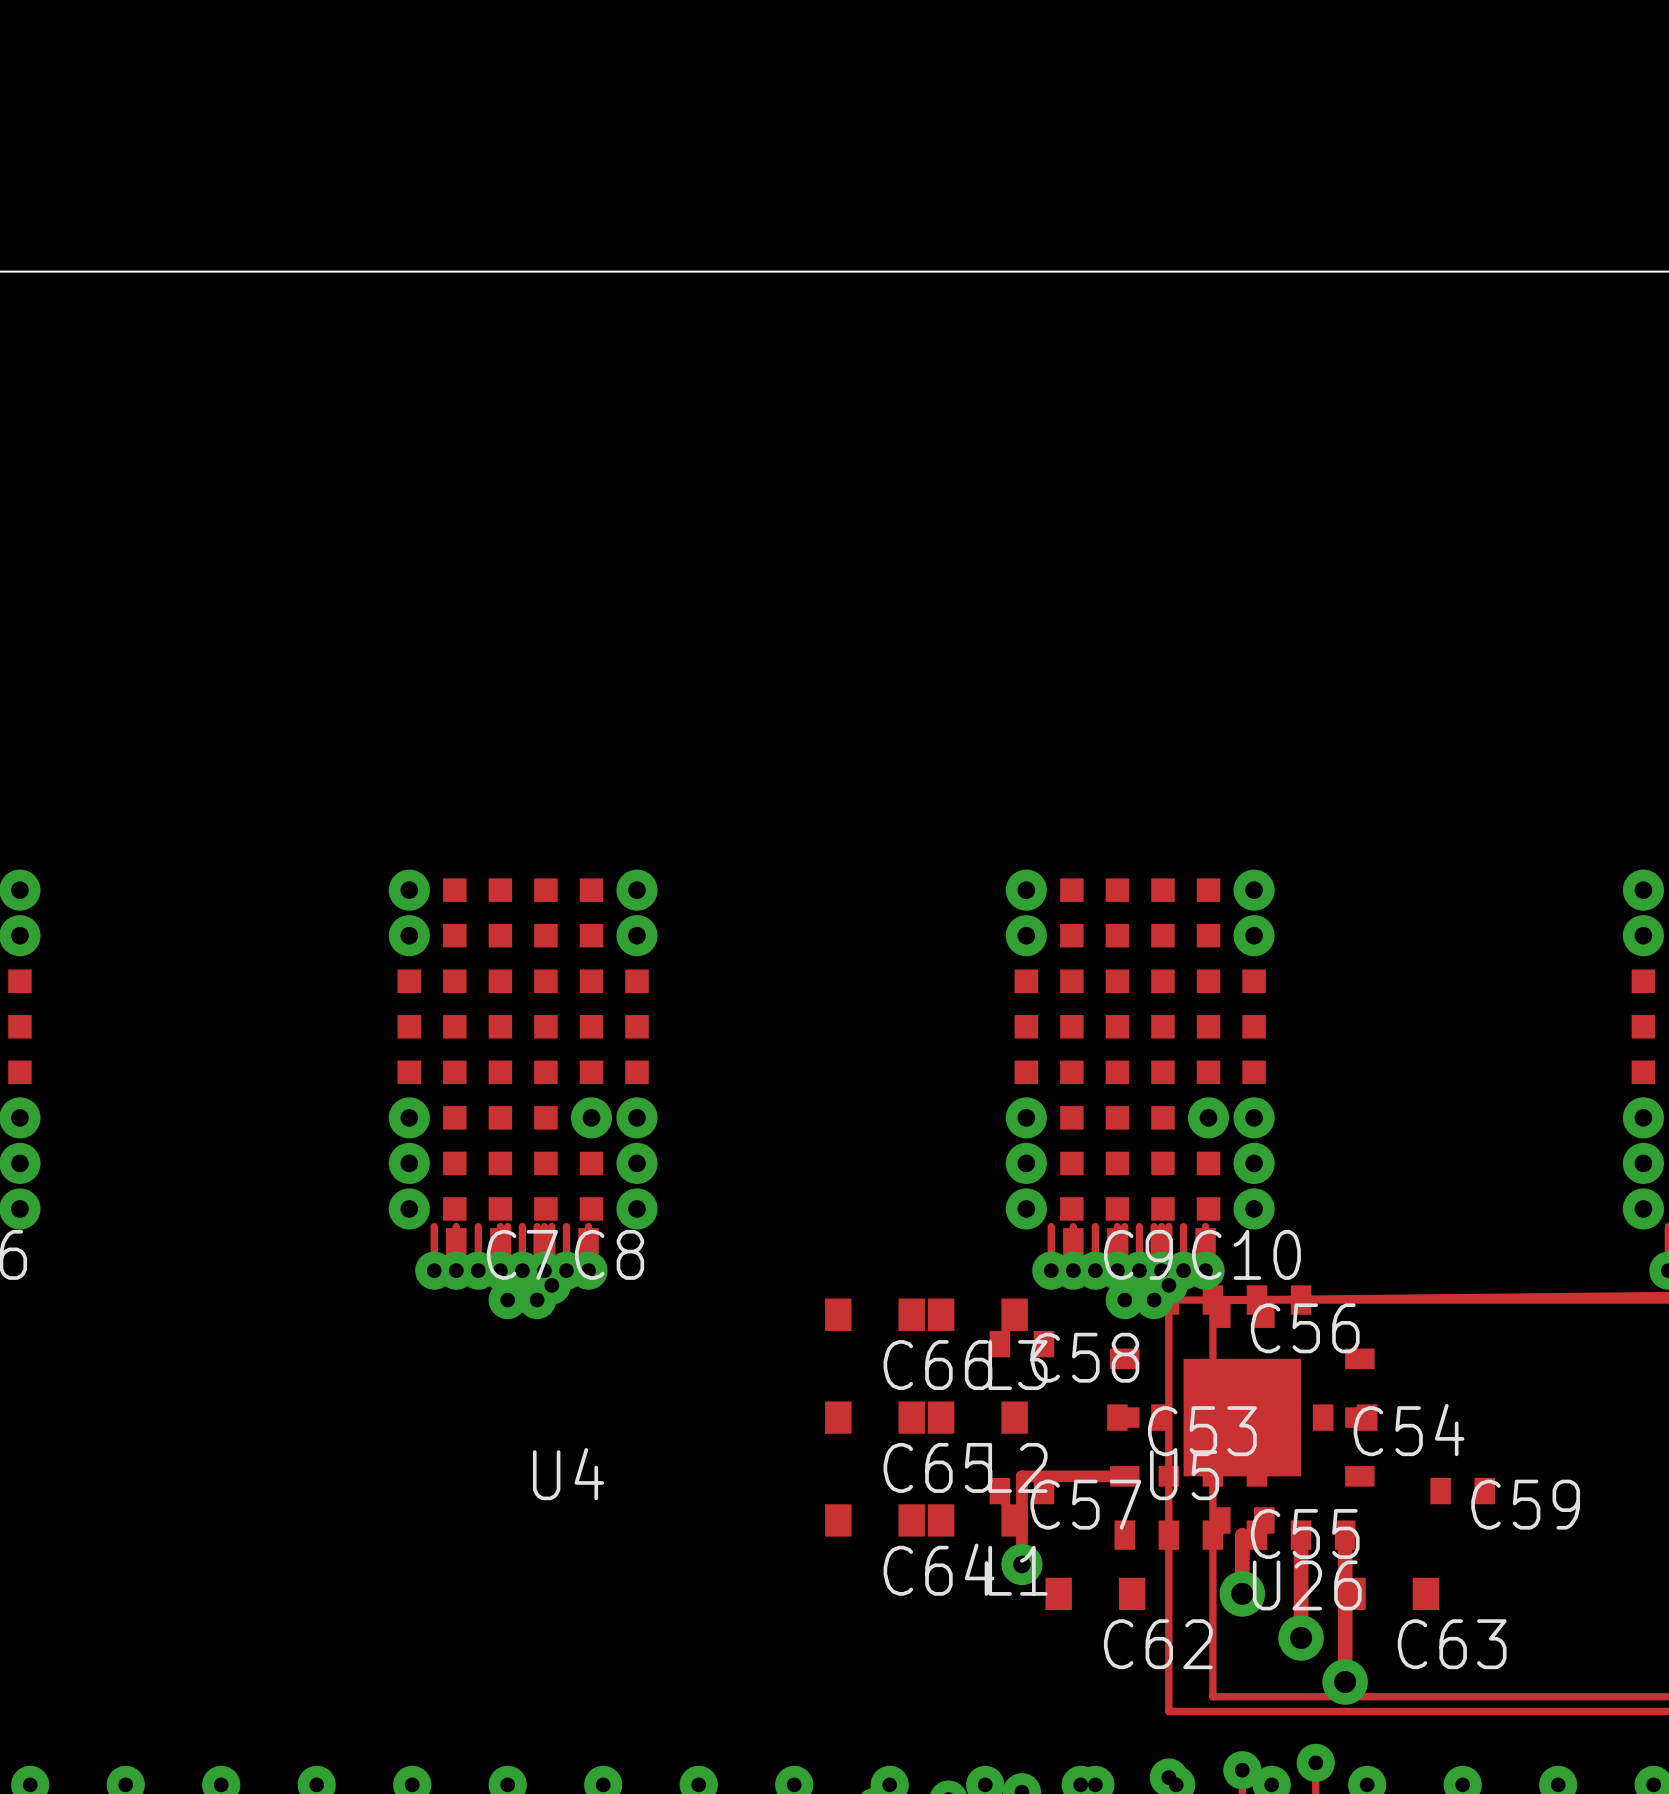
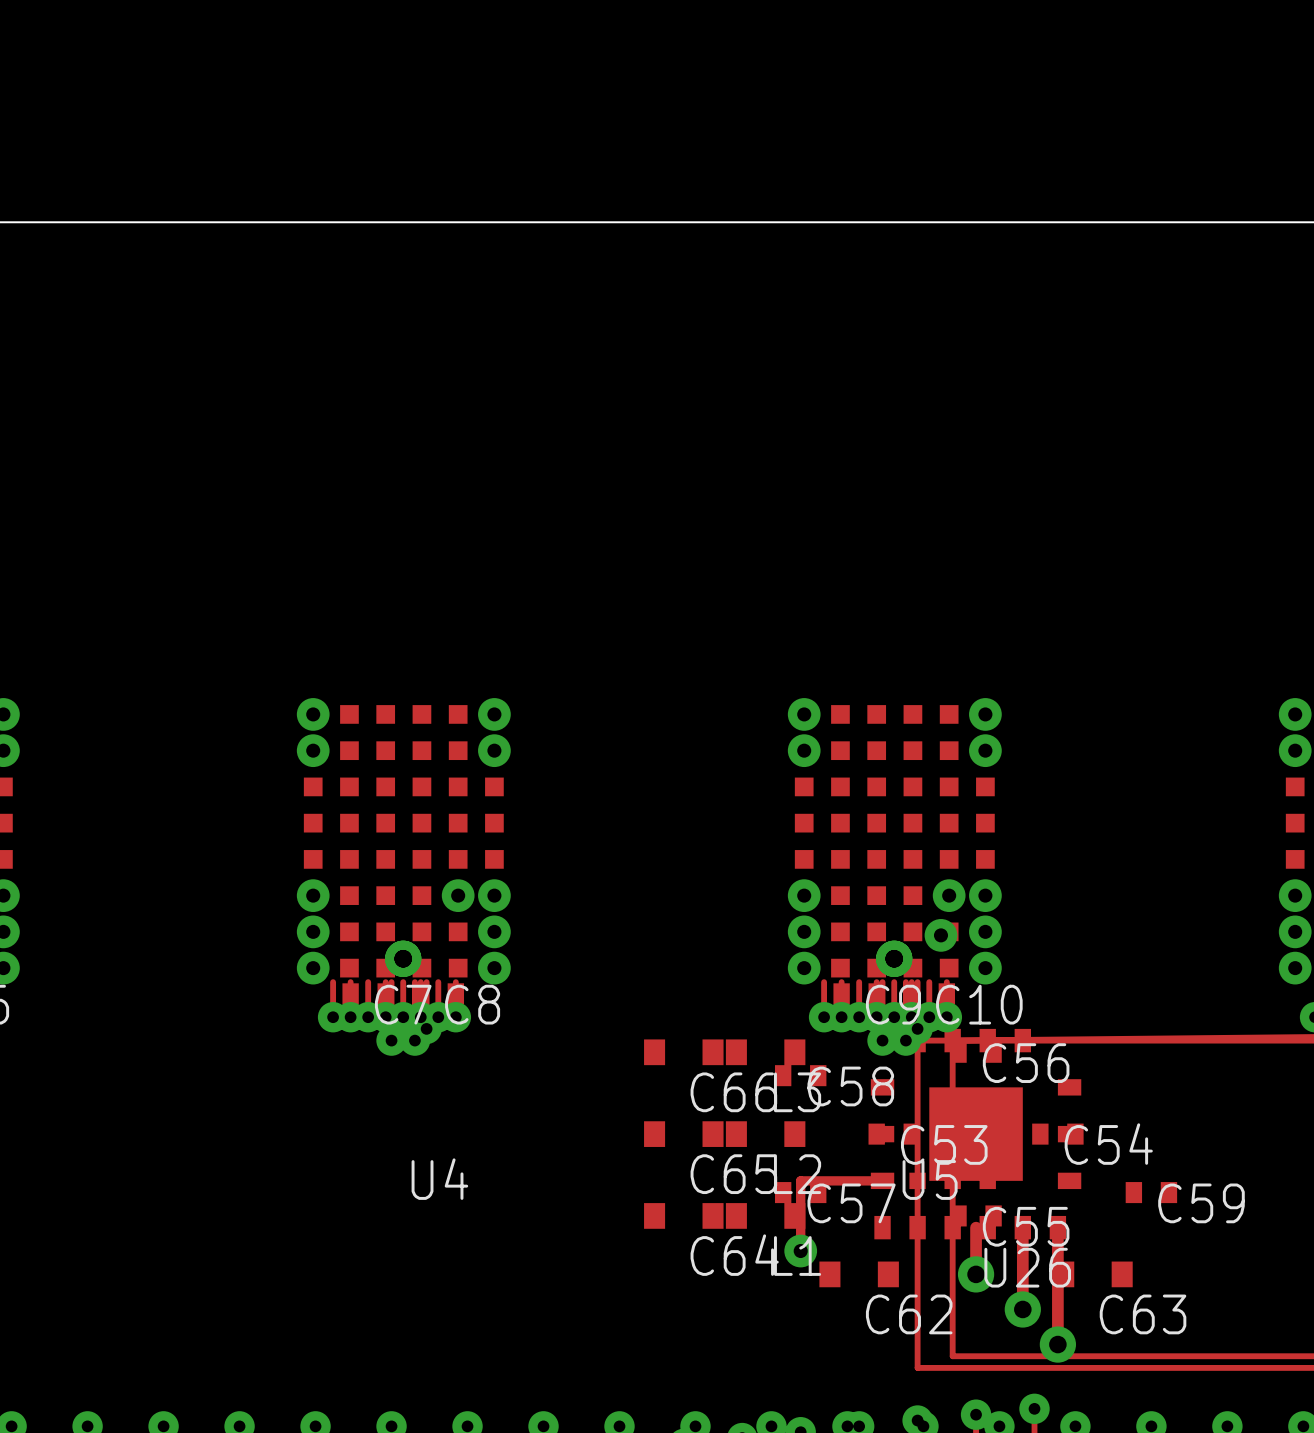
via: none -> (940, 935)
via: none -> (403, 958)
via: none -> (894, 958)

